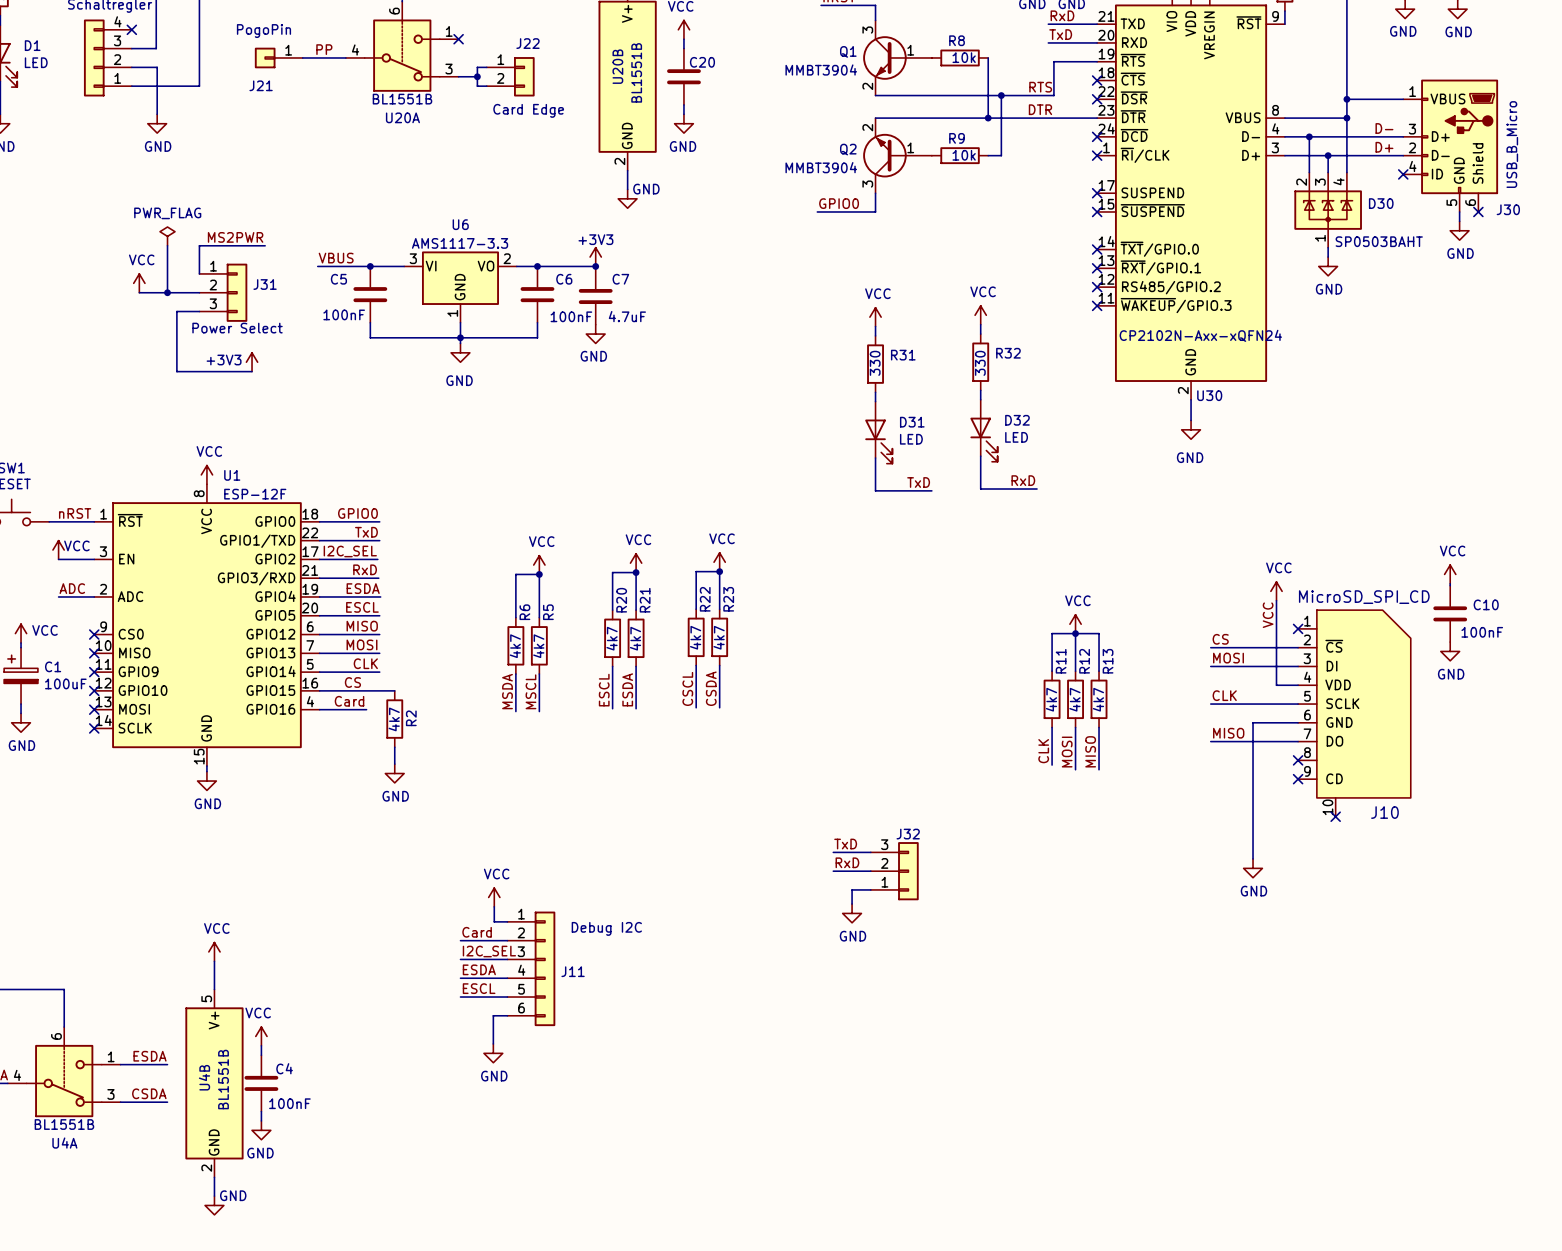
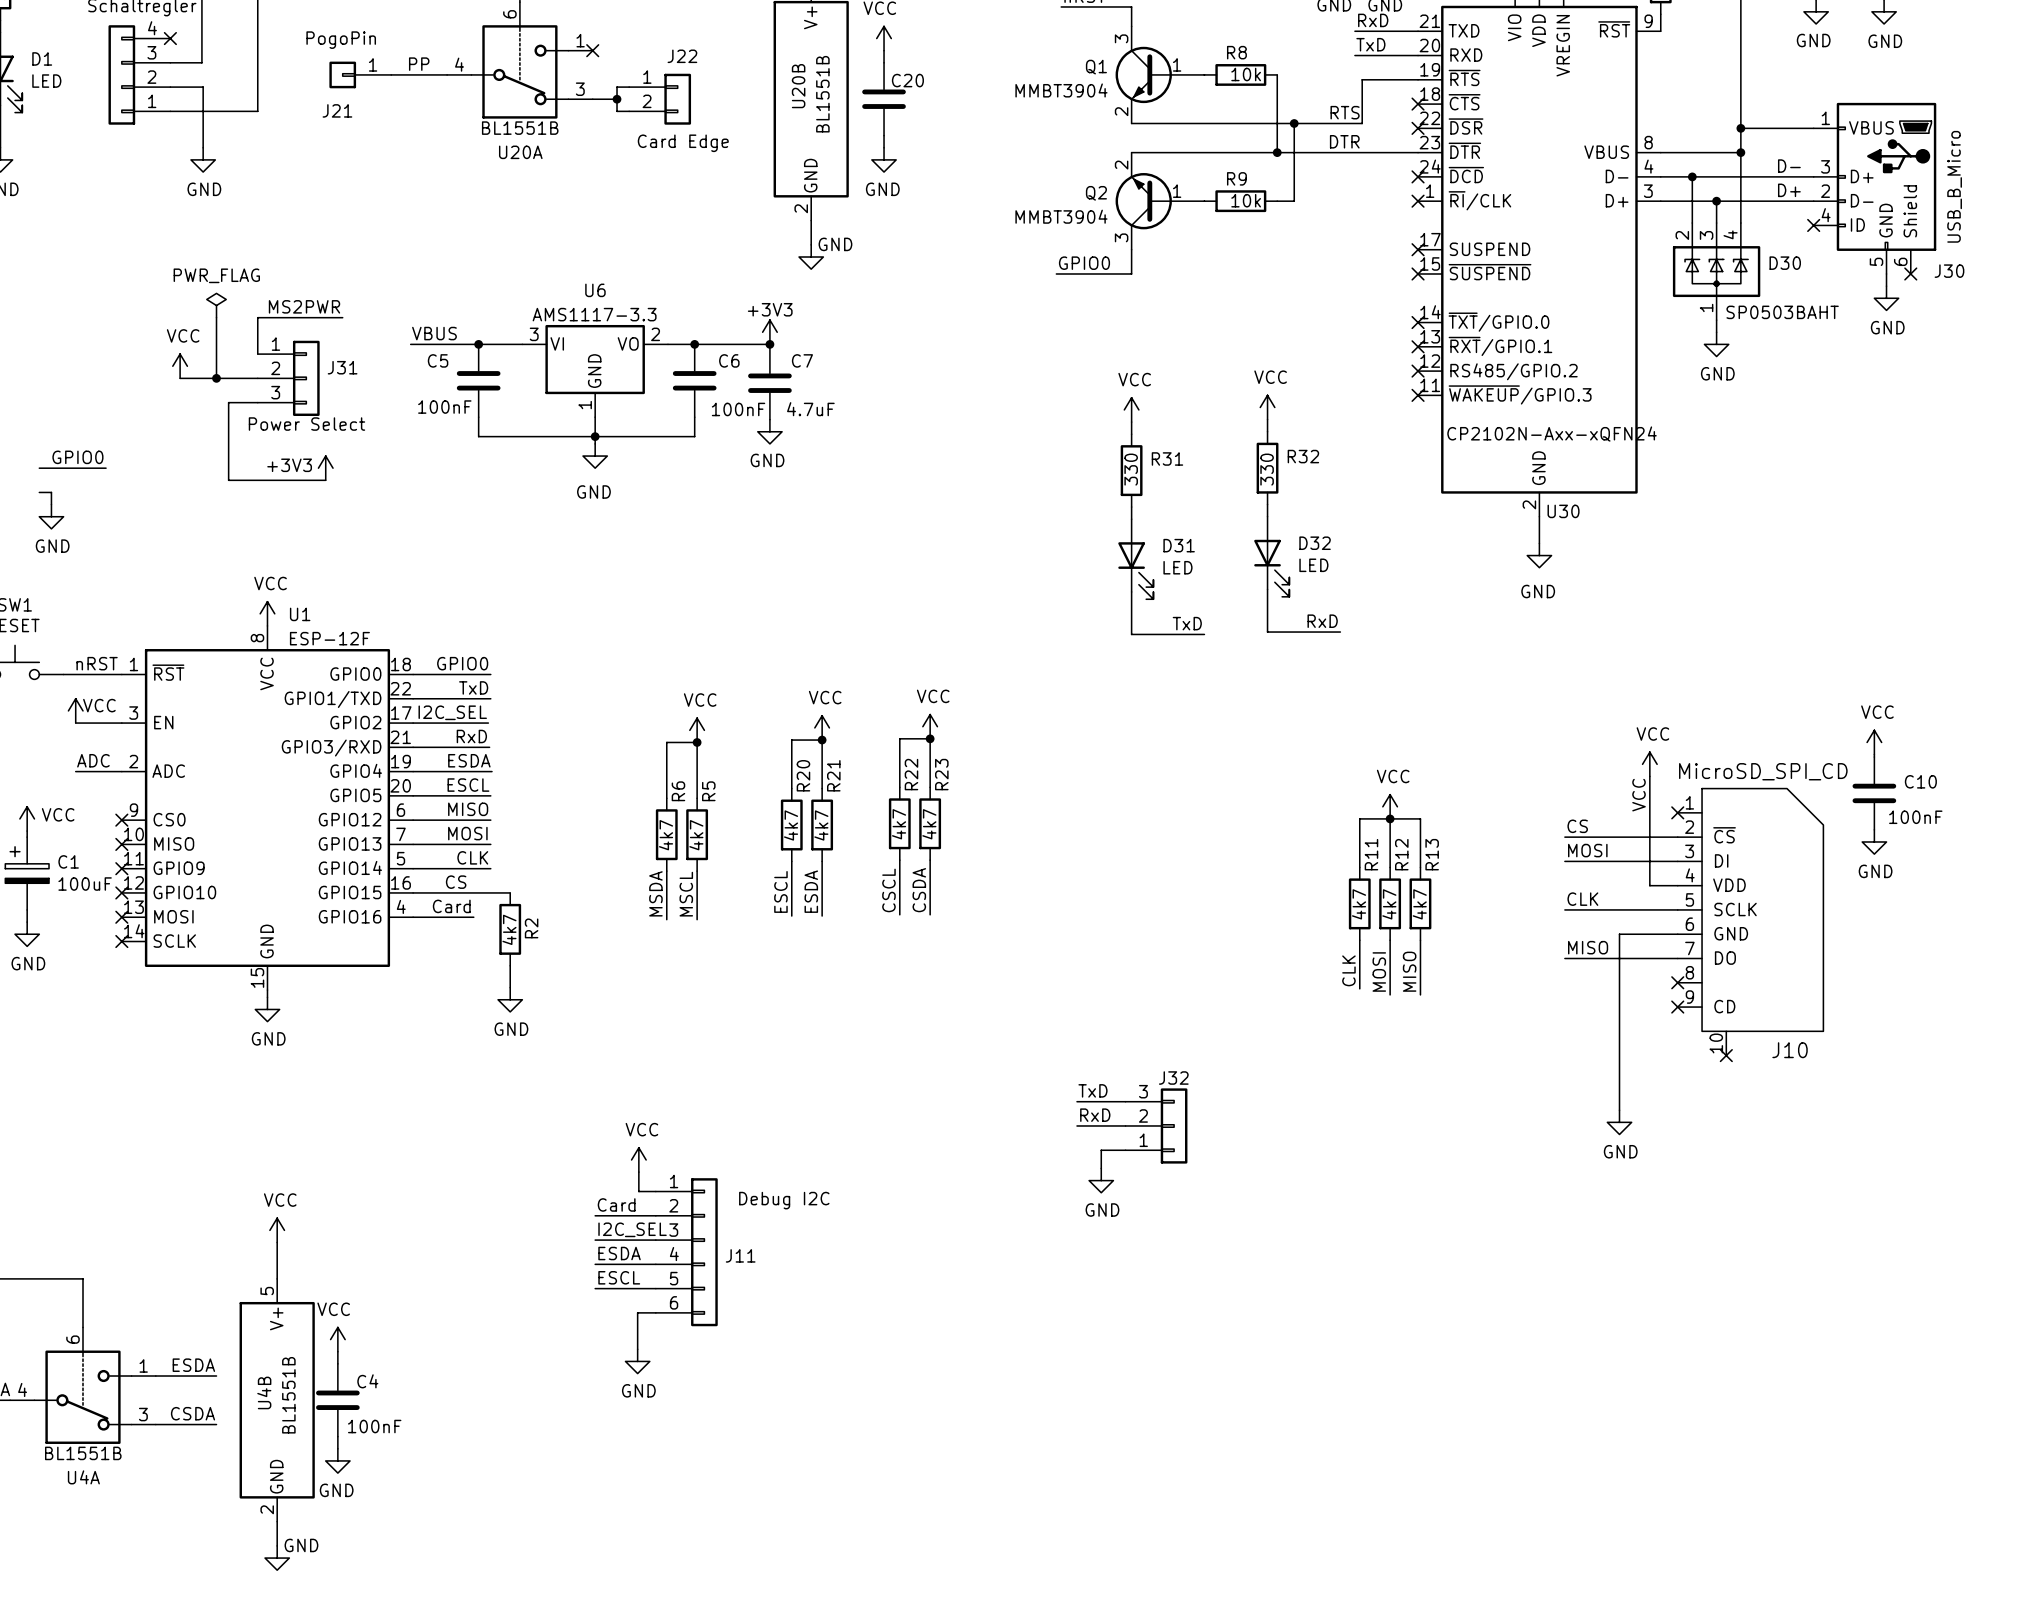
label: none -> GPIO0 (77, 457)
wire: none -> (39, 468) (106, 468)
wire: none -> (39, 492) (51, 492) (51, 504)
power symbol: none -> GND (51, 516)

